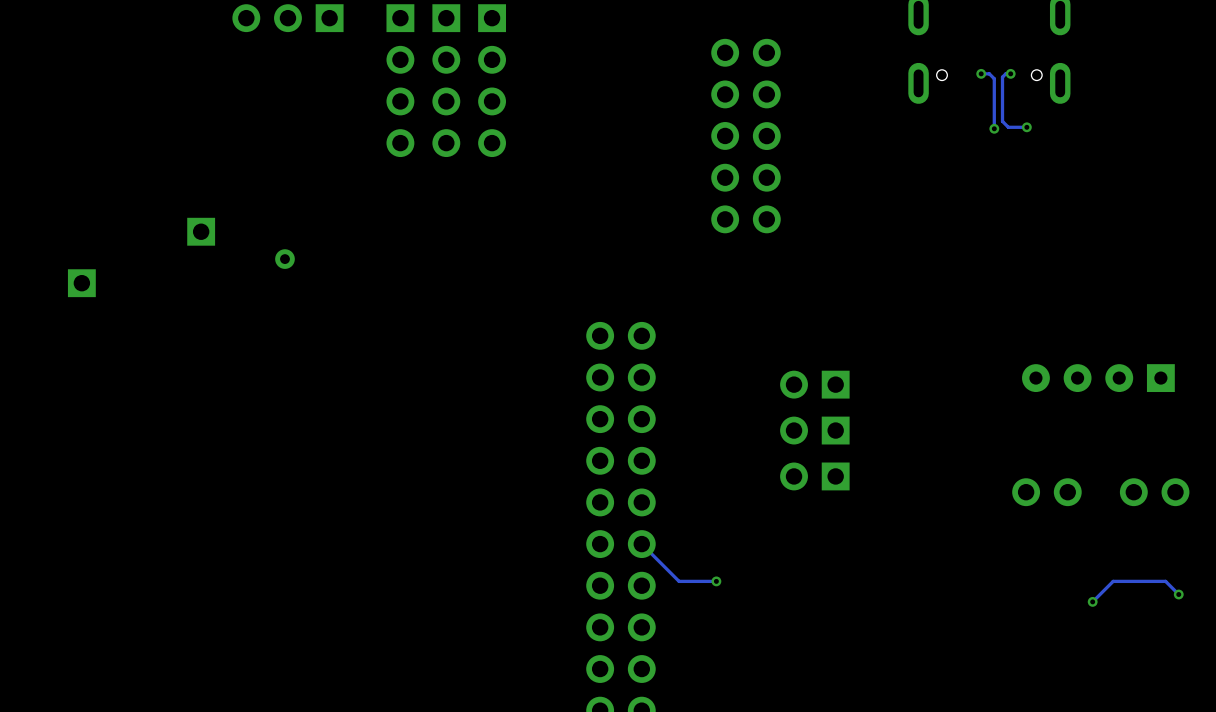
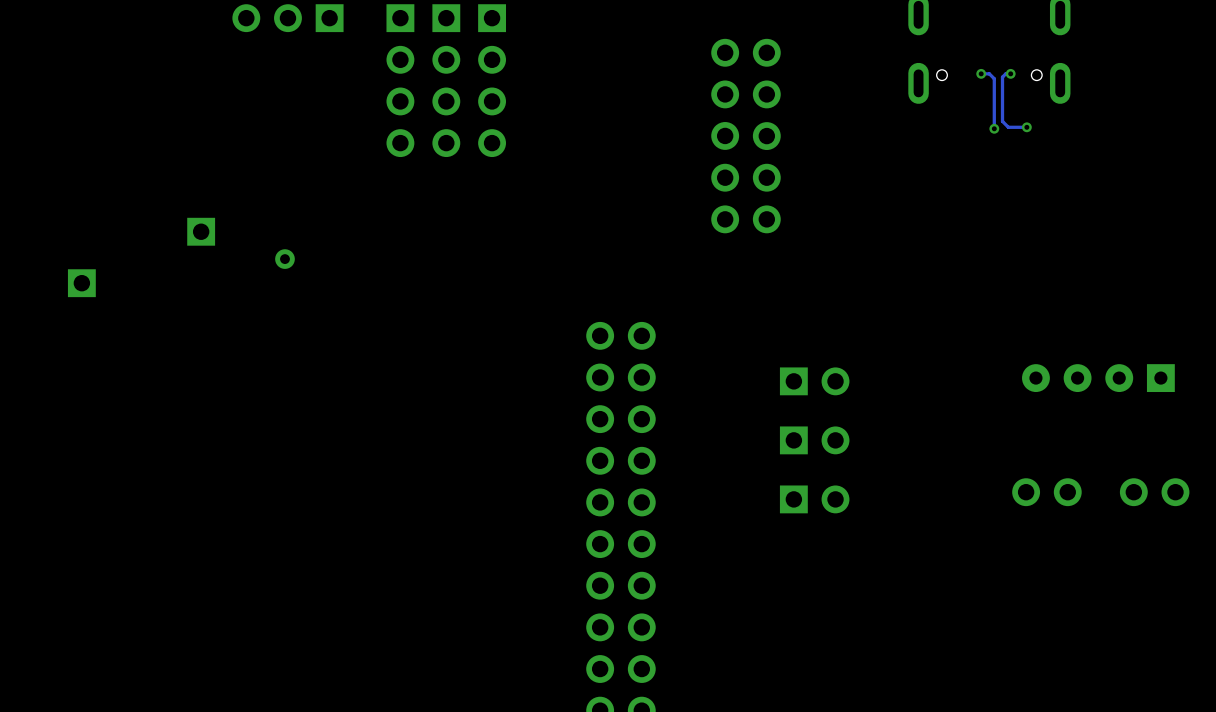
part rotation: 0° (814, 384) -> 180° (814, 381)
part rotation: 0° (814, 430) -> 180° (814, 440)
part rotation: 0° (814, 476) -> 180° (814, 499)
track: (641, 544) (679, 581) (716, 581) -> none
via: (716, 581) -> none
track: (1178, 594) (1165, 581) (1113, 581) (1092, 601) -> none
via: (1178, 594) -> none
via: (1092, 601) -> none

